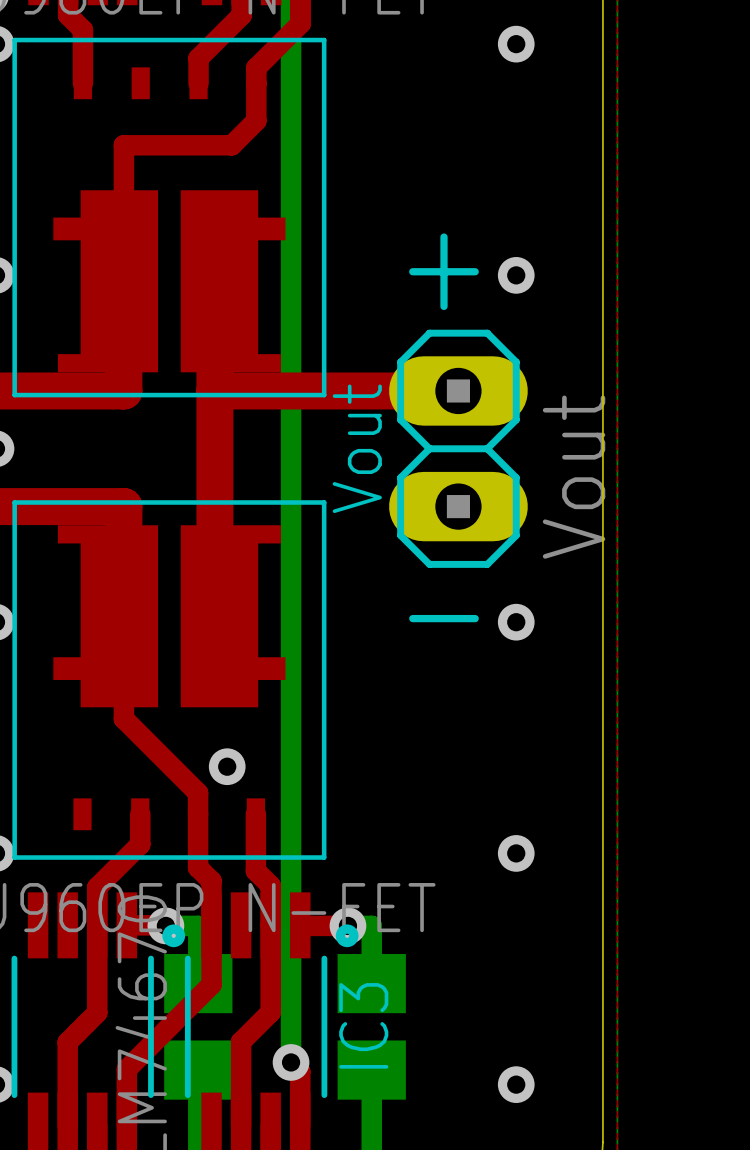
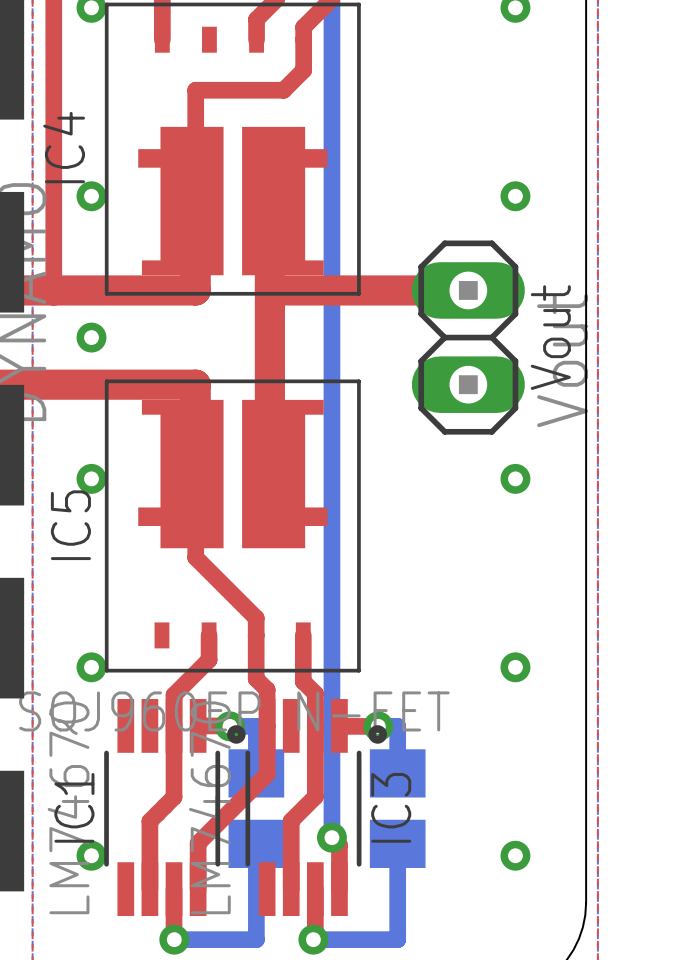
text: + (443, 271) -> none
text position: Vout (357, 448) -> Vout (550, 337)
text: - (443, 618) -> none
via: (227, 766) -> none

